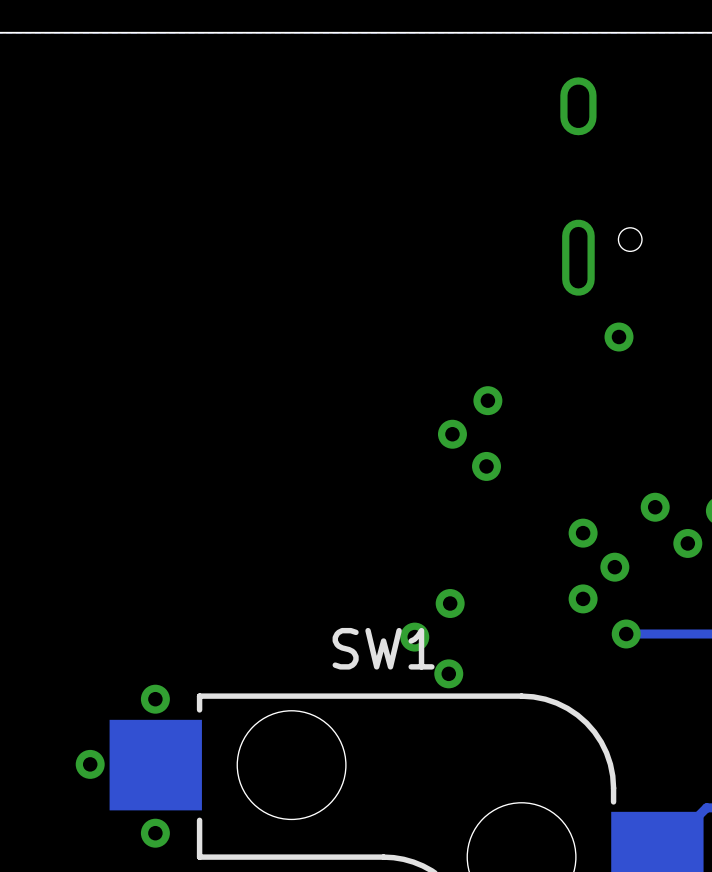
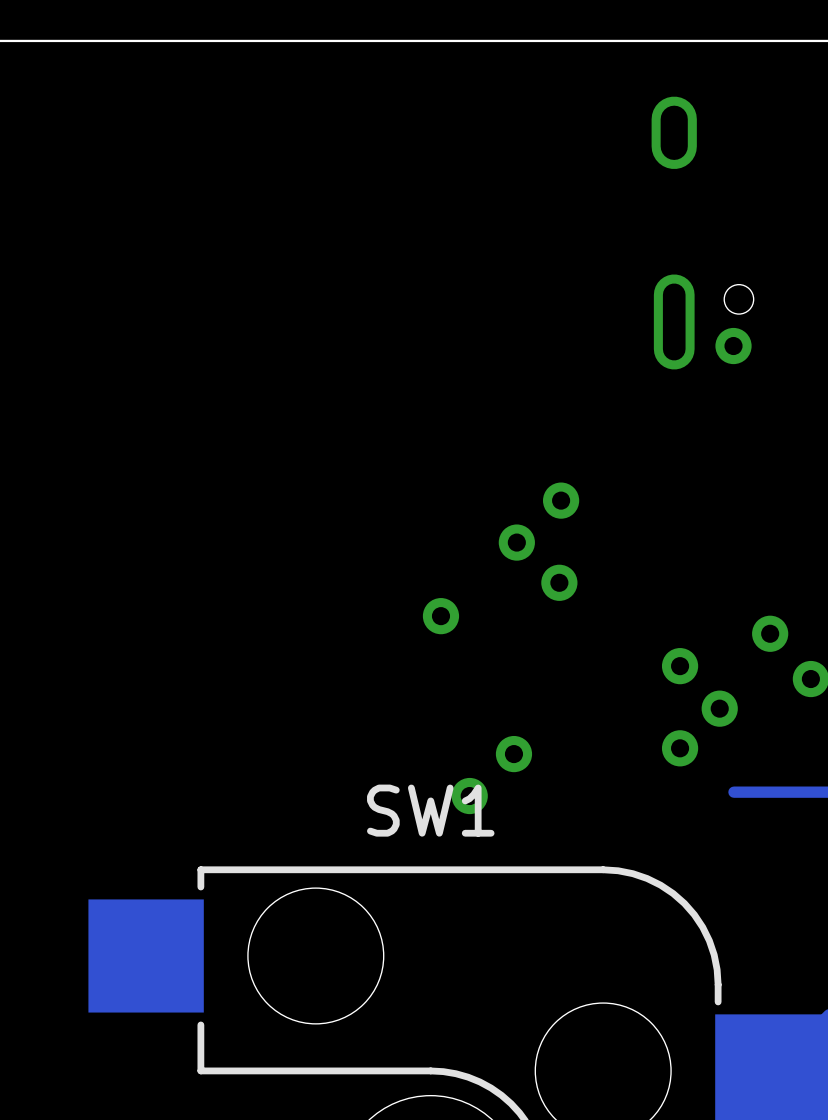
via position: (618, 337) -> (733, 346)
via: none -> (440, 616)
via: (626, 634) -> none
via: (448, 673) -> none
via: (155, 699) -> none
via: (90, 764) -> none
via: (155, 833) -> none

